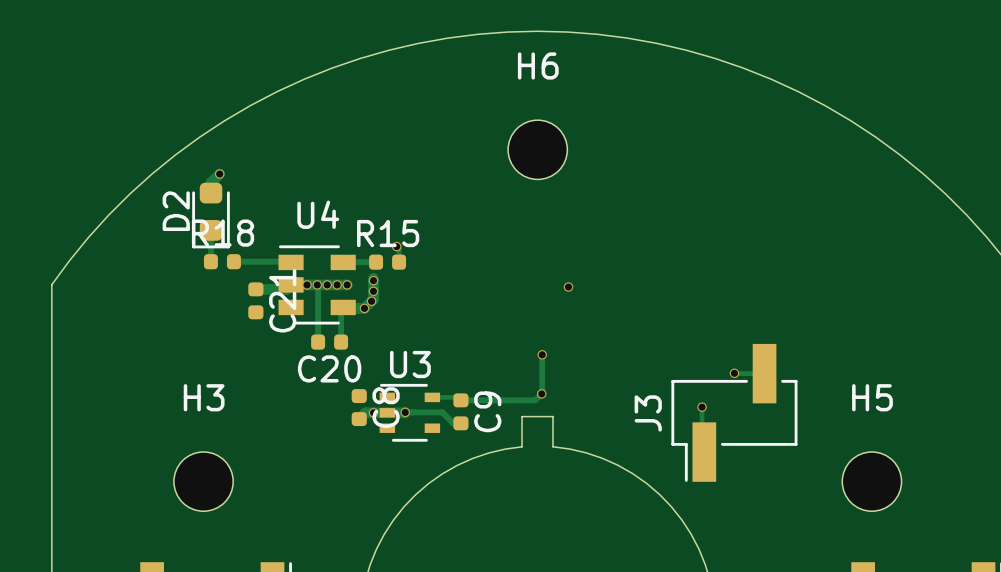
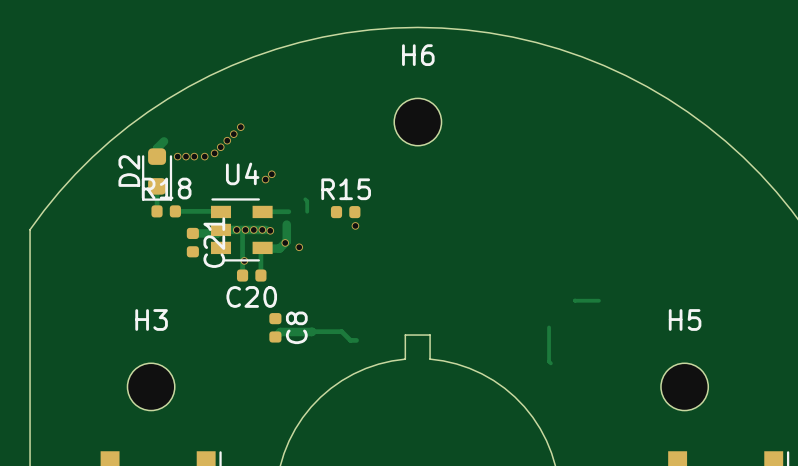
via: none -> (240, 127)
via: none -> (233, 134)
via: none -> (227, 140)
via: (219, 174) -> none
via: none -> (220, 147)
via: none -> (214, 153)
via: none -> (177, 156)
via: none -> (186, 156)
via: none -> (194, 156)
via: none -> (204, 156)
via: none -> (271, 174)
via: none -> (265, 179)
via: (396, 246) -> none
R15 position: (387, 262) -> (345, 212)
via: none -> (355, 225)
via: (373, 280) -> none
via: (307, 284) -> none
via: none -> (236, 229)
via: (317, 284) -> none
via: none -> (245, 229)
via: (327, 284) -> none
via: none -> (253, 229)
via: (337, 284) -> none
via: none -> (262, 229)
via: (347, 284) -> none
via: none -> (270, 230)
via: (568, 287) -> none
via: (373, 291) -> none
via: none -> (299, 247)
via: (364, 308) -> none
via: none -> (244, 260)
track: (542, 354) (542, 393) (535, 400) (460, 400) (457, 397) (432, 397) -> none
via: (542, 354) -> none
via: (734, 373) -> none
via: (541, 393) -> none
via: (702, 407) -> none
C9: (460, 411) -> none
via: (373, 412) -> none
via: (405, 412) -> none
U3: (409, 412) -> none
J3: (734, 412) -> none

